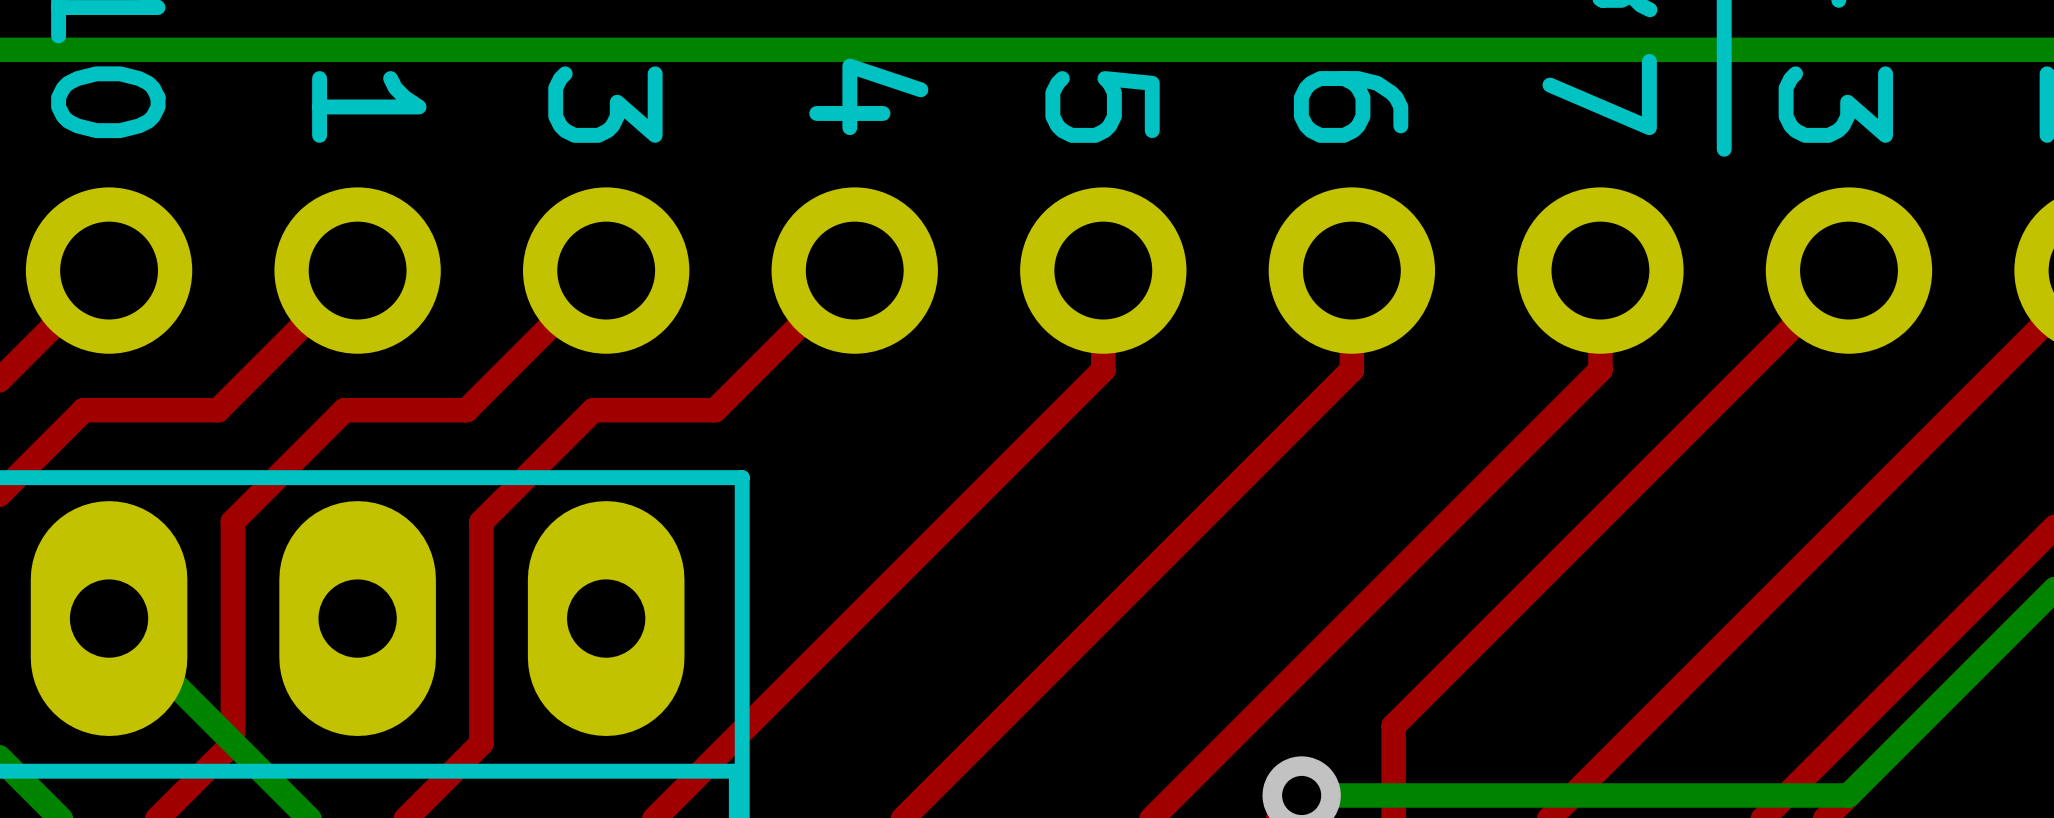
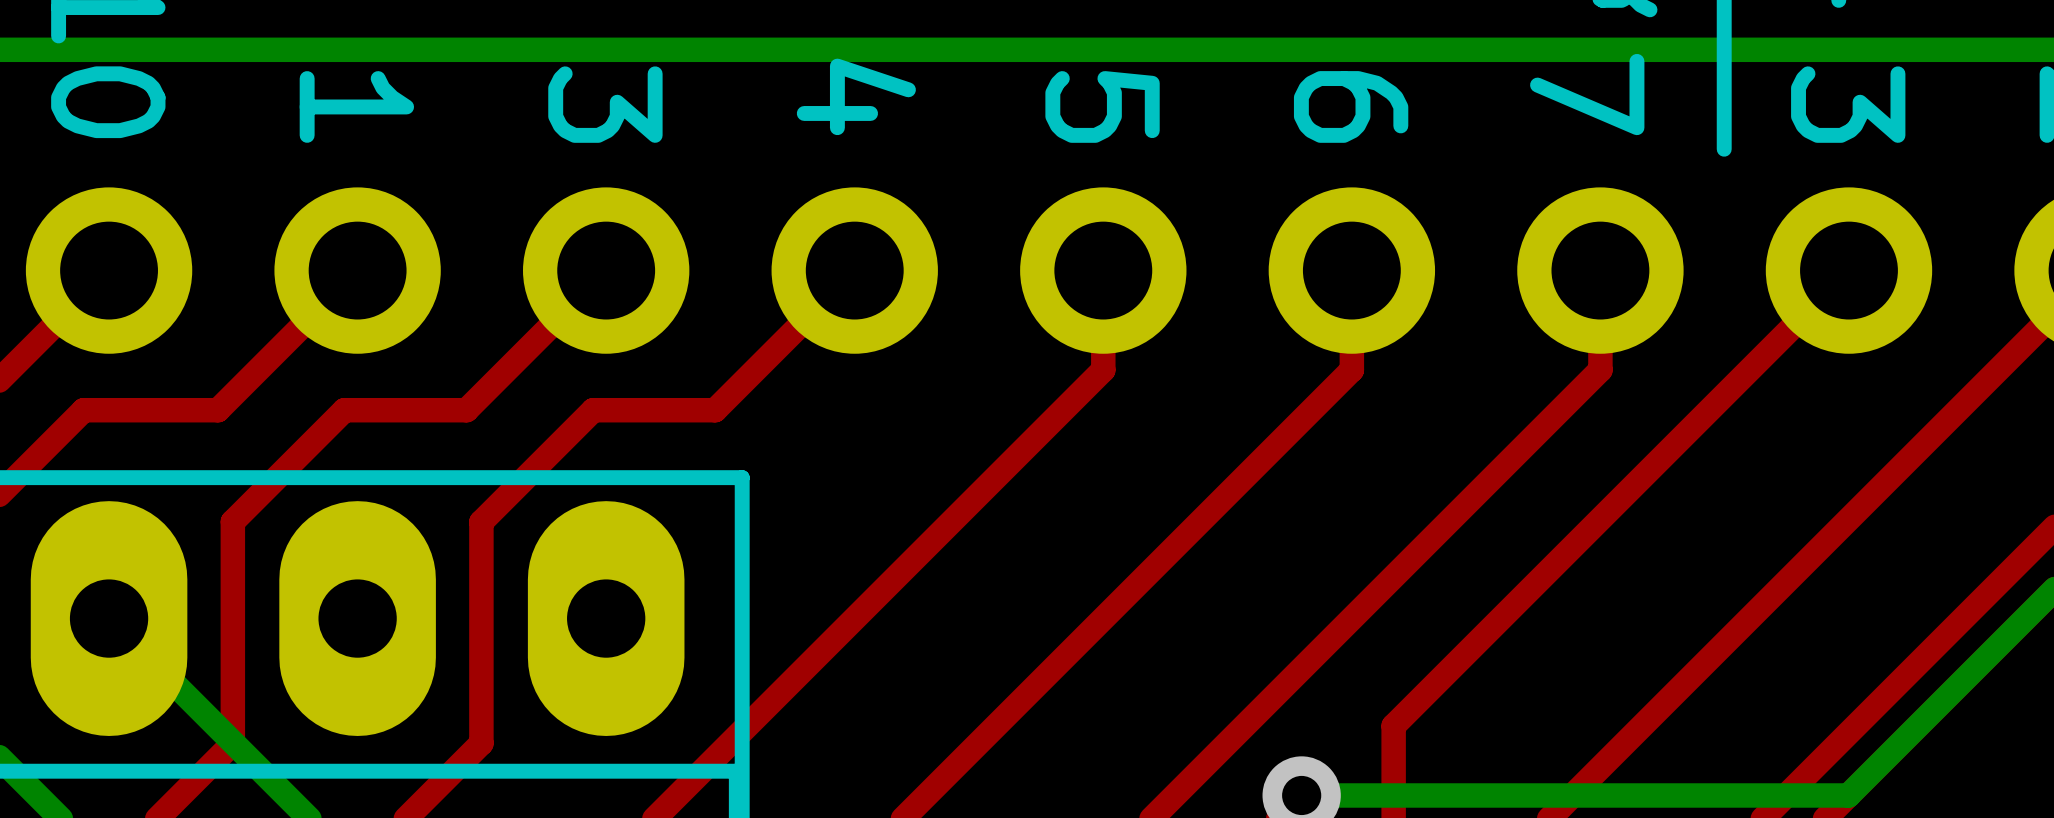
text position: 7 (1599, 94) -> 7 (1587, 94)
text position: 4 (868, 96) -> 4 (856, 96)
text position: 3 (1835, 104) -> 3 (1848, 104)
text position: 1 (369, 106) -> 1 (356, 106)

